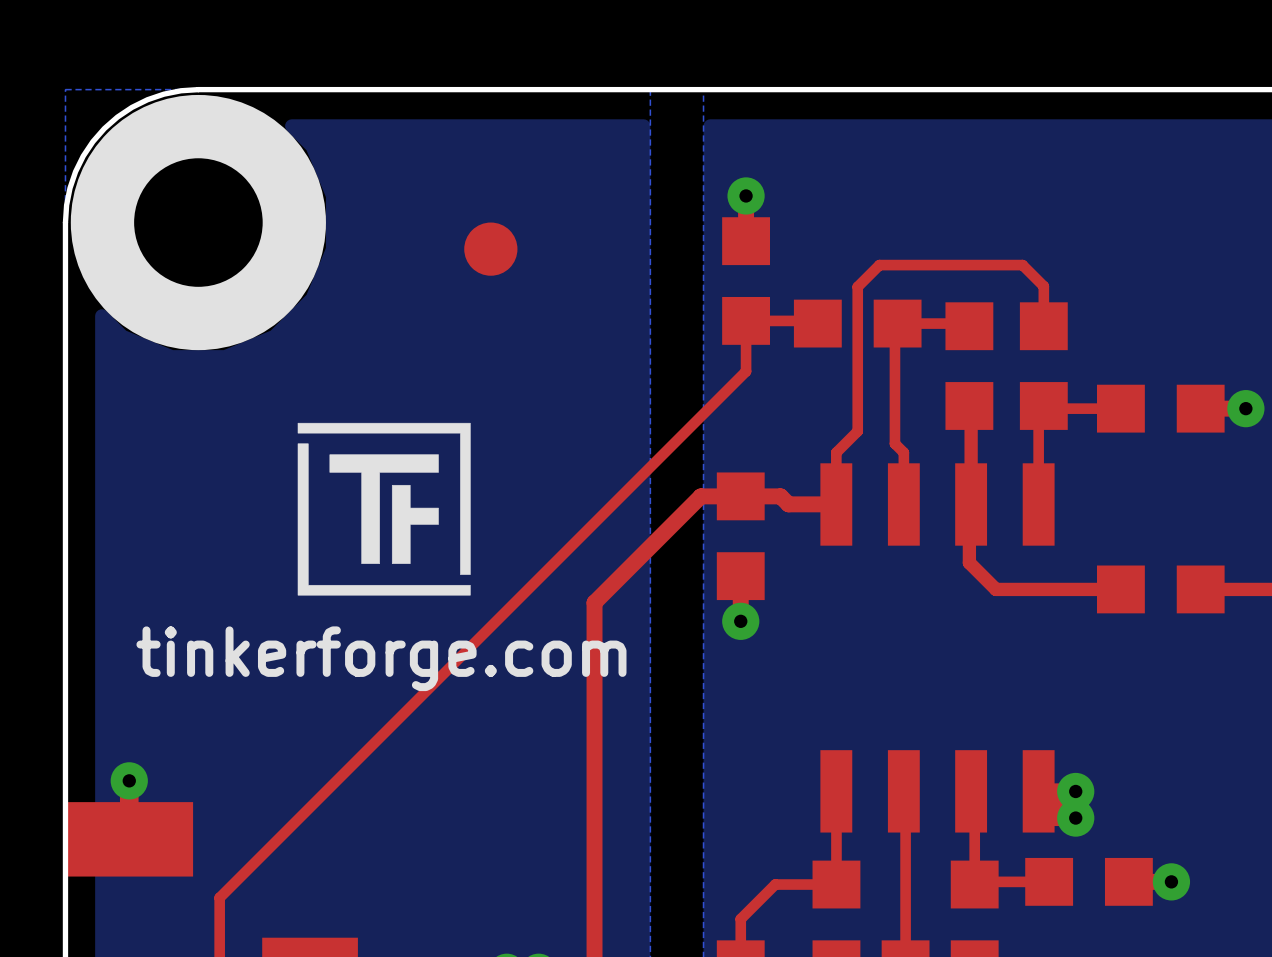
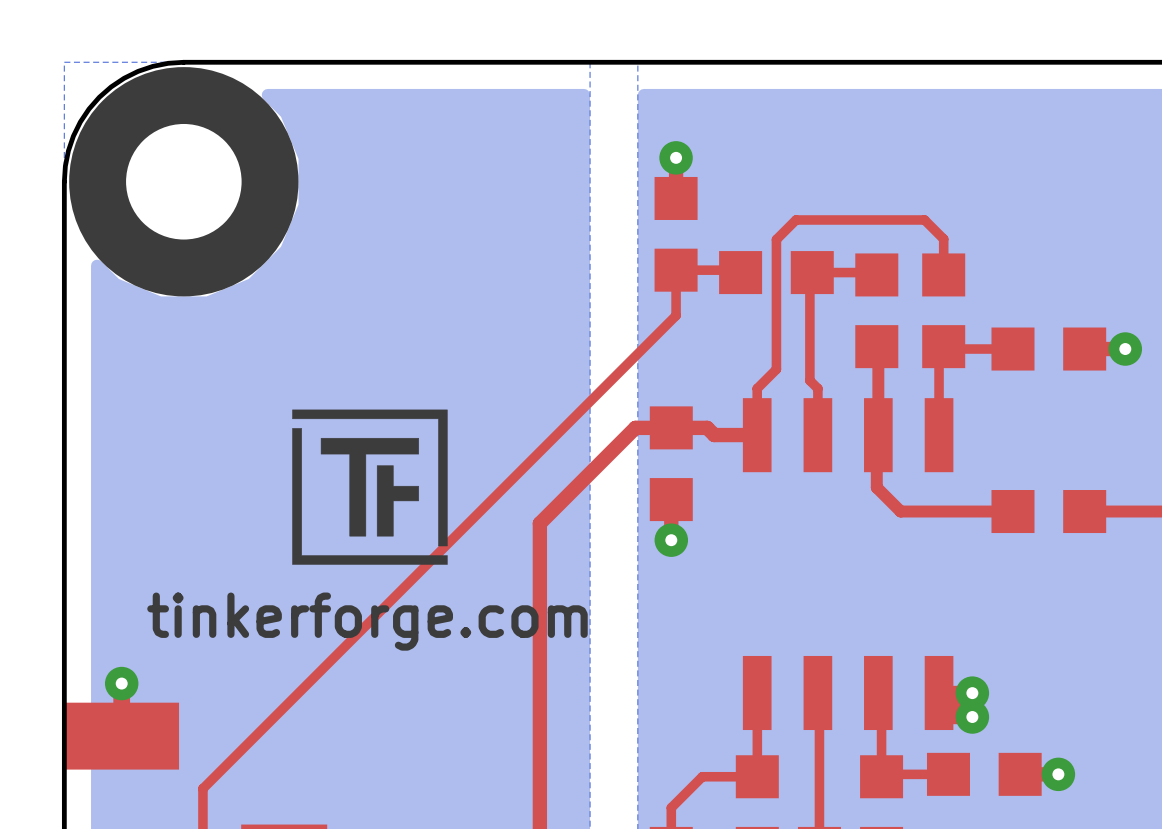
part: (490, 249) -> none
drawing position: (384, 509) -> (369, 487)
text position: tinkerforge.com (381, 658) -> tinkerforge.com (367, 621)

